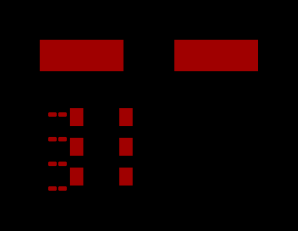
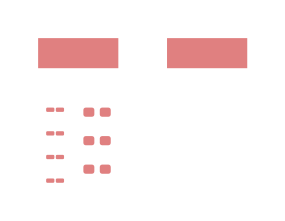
part footprint: [69, 108, 133, 127] -> [83, 107, 111, 117]
part footprint: [69, 137, 133, 156] -> [83, 136, 111, 146]
part footprint: [69, 167, 133, 186] -> [83, 164, 111, 174]

